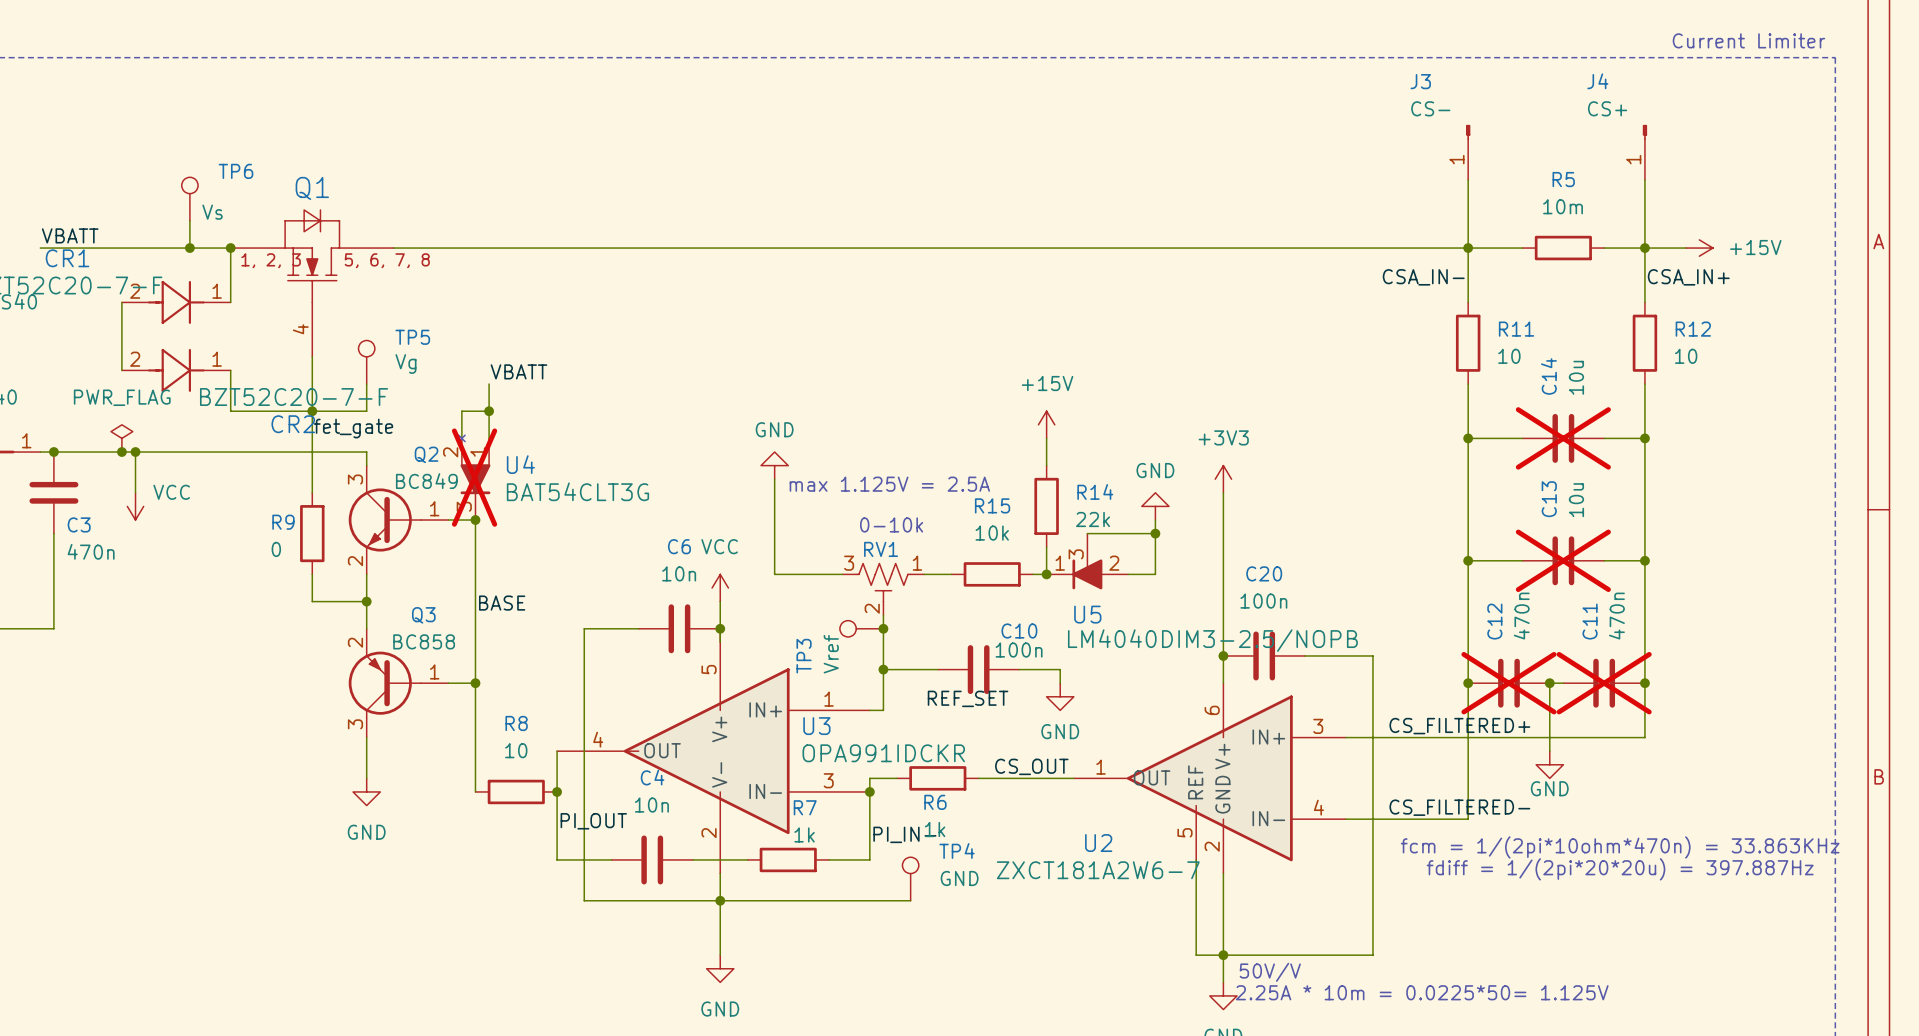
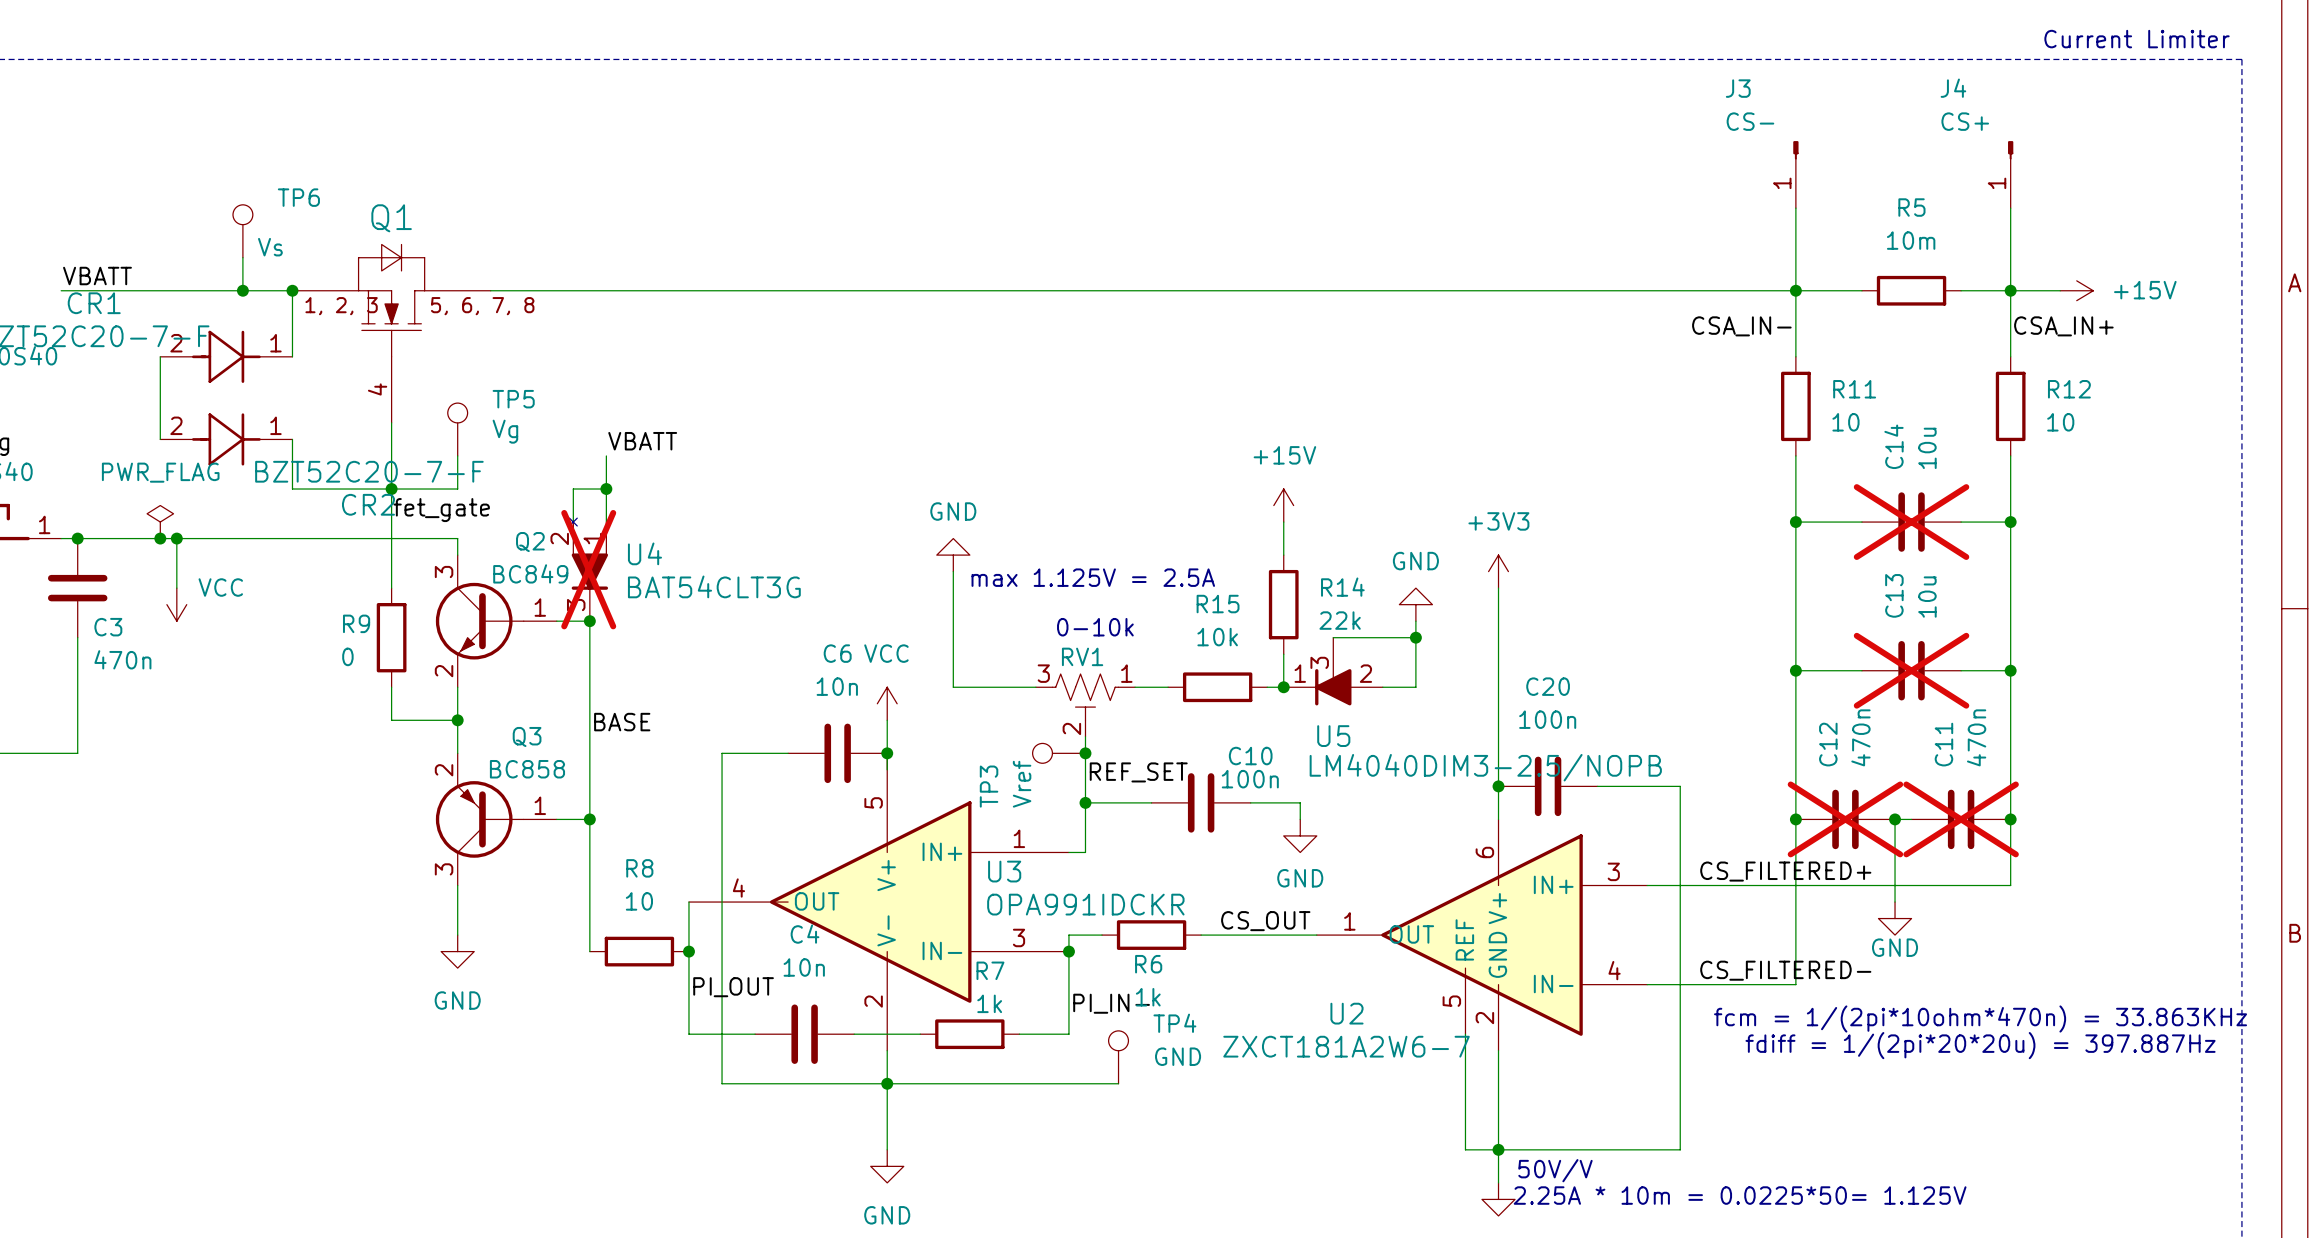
label position: REF_SET (968, 698) -> REF_SET (1138, 772)

